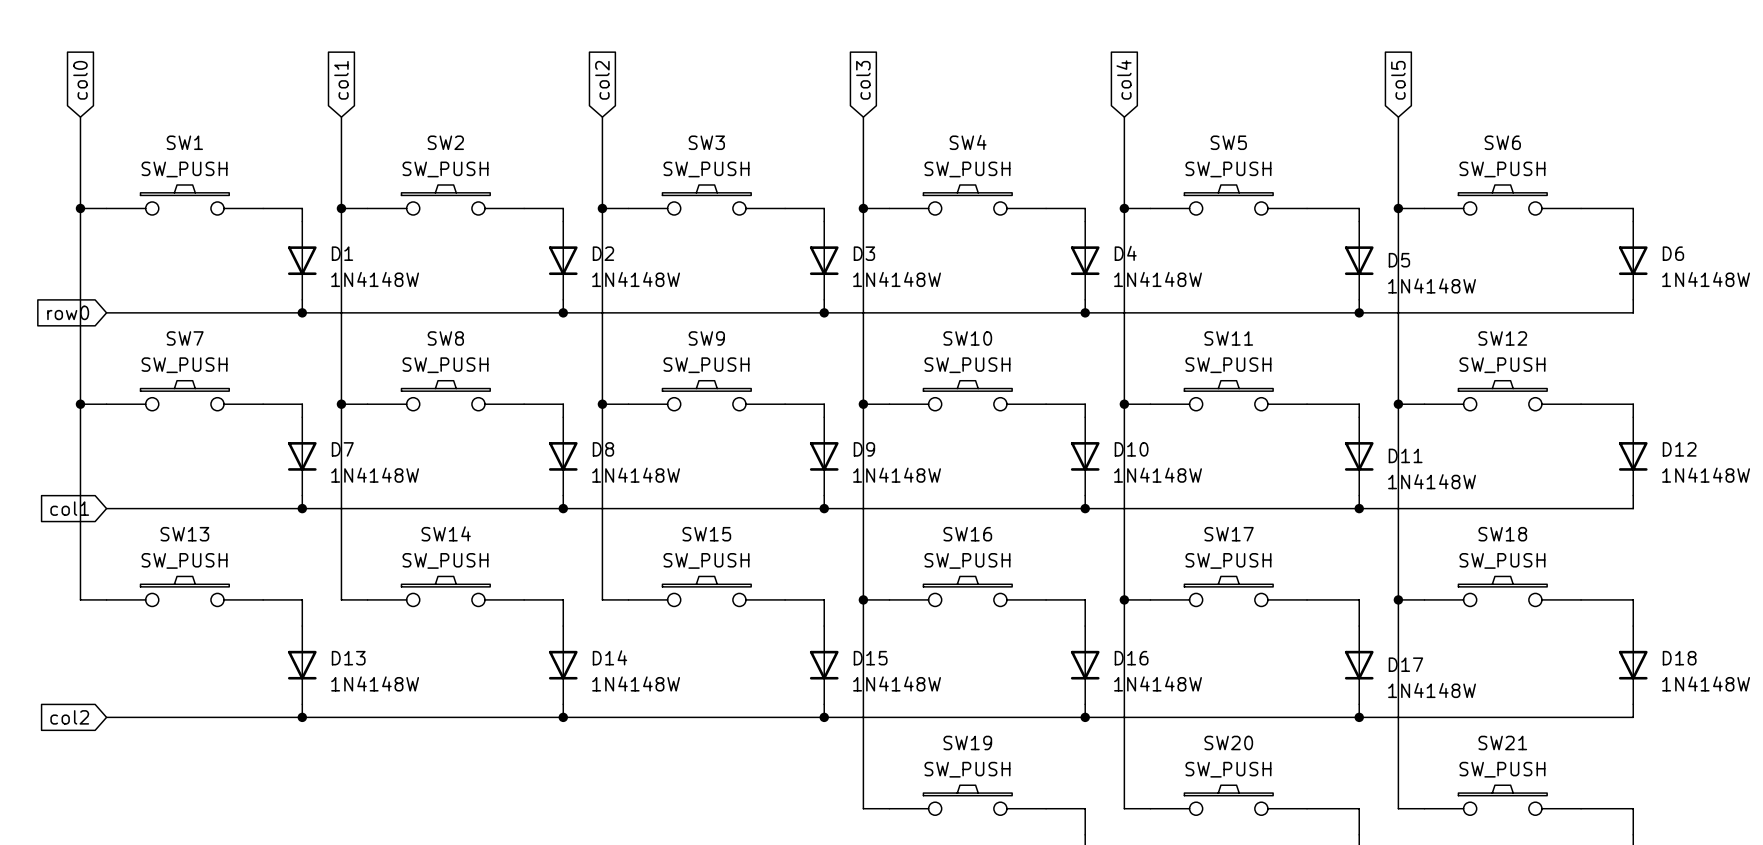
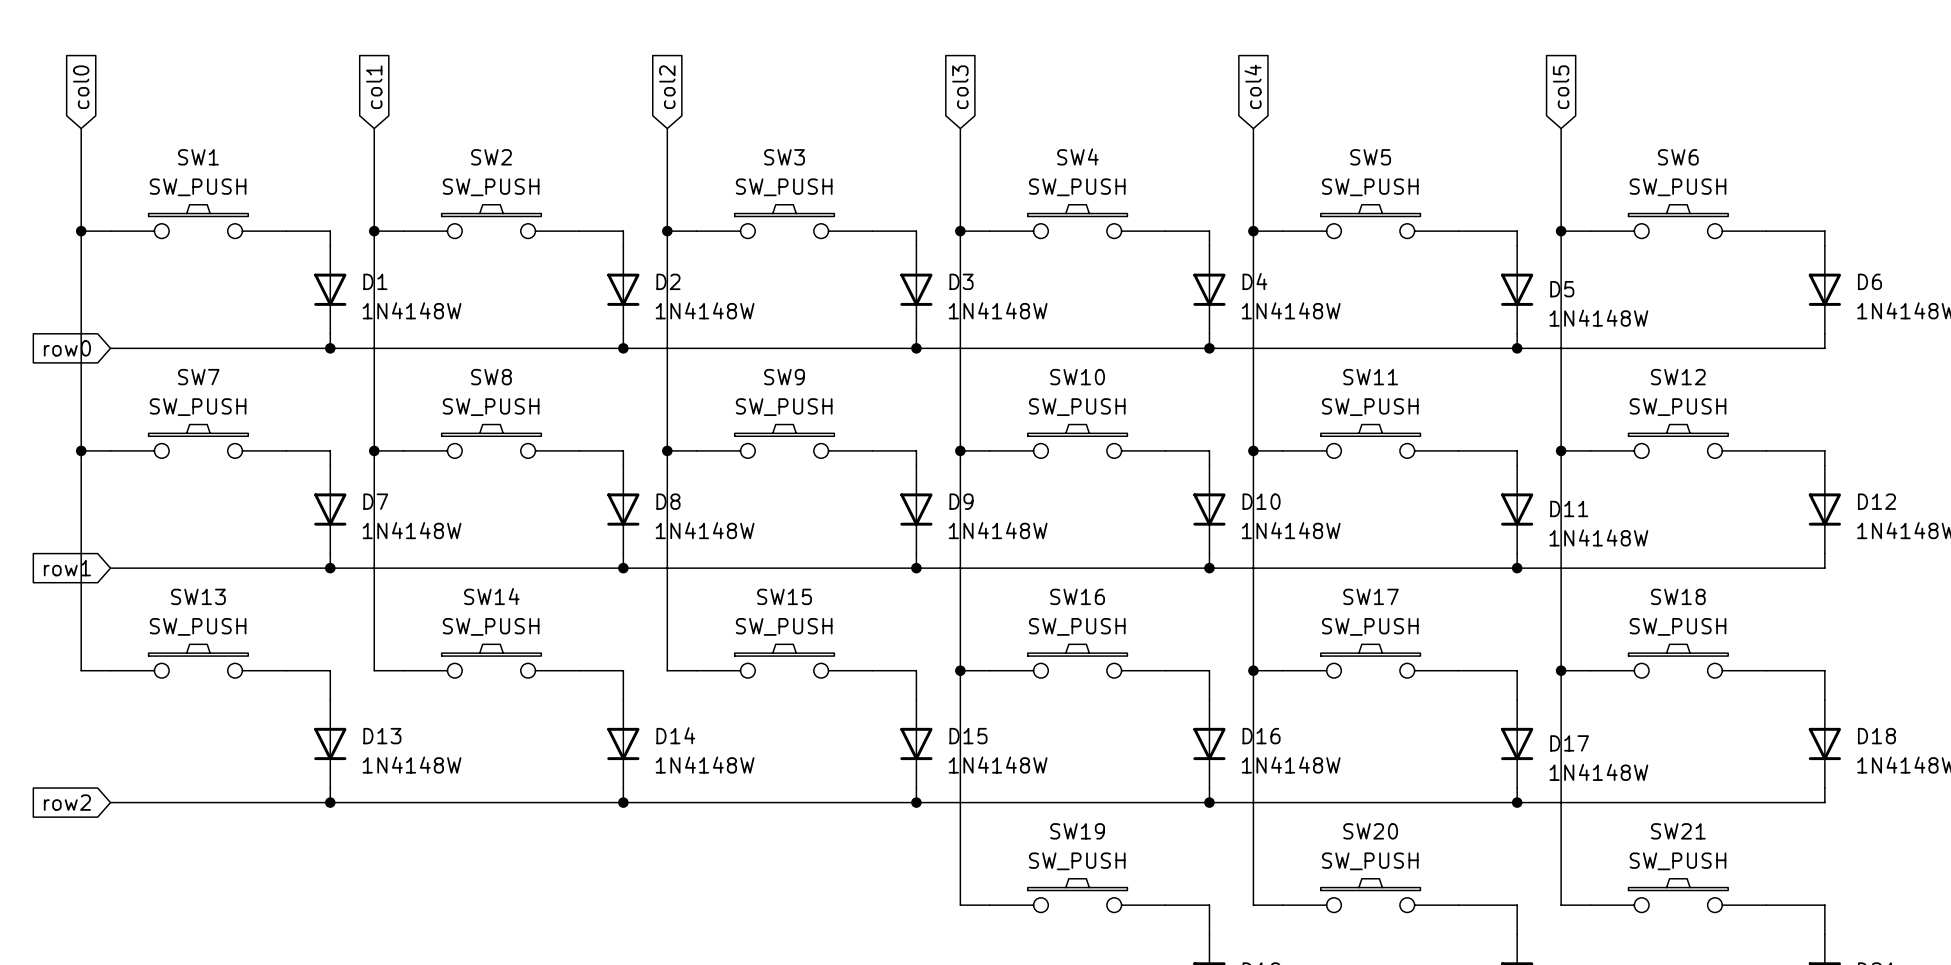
global label: col1 (69, 508) -> row1 (67, 568)
global label: col2 (69, 717) -> row2 (67, 802)

